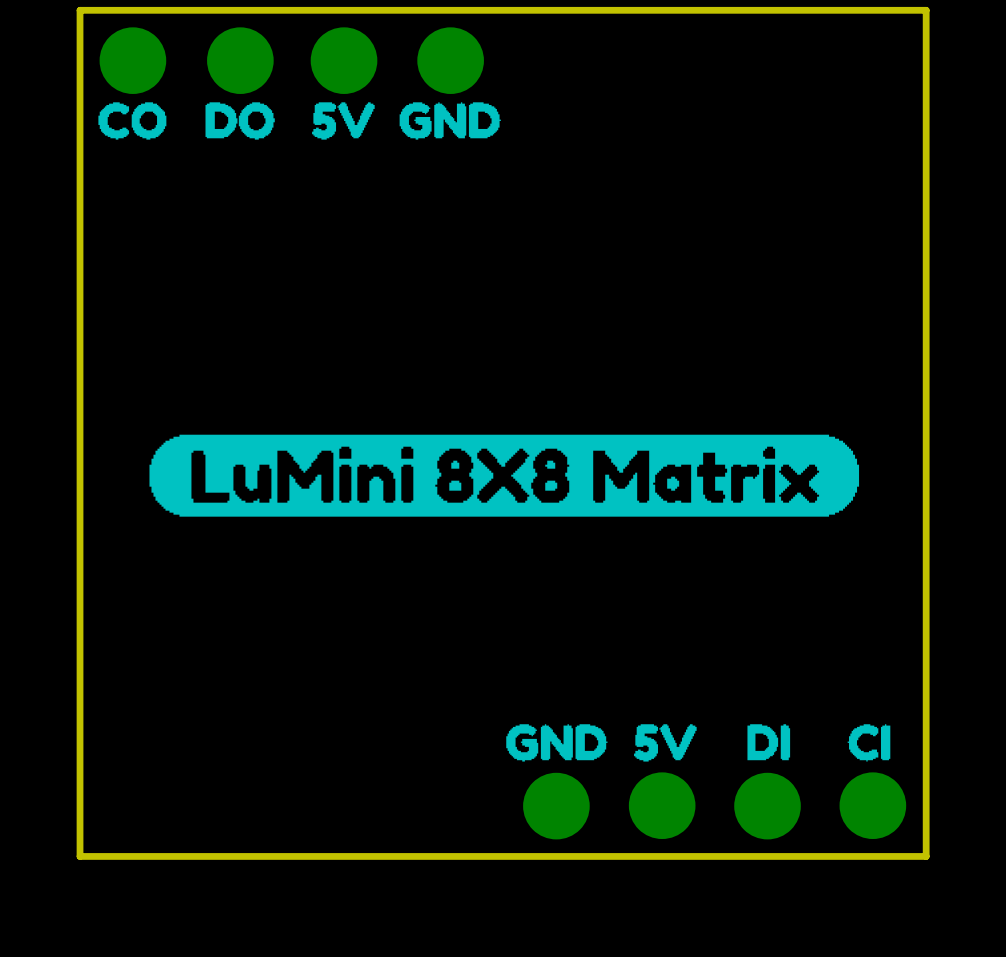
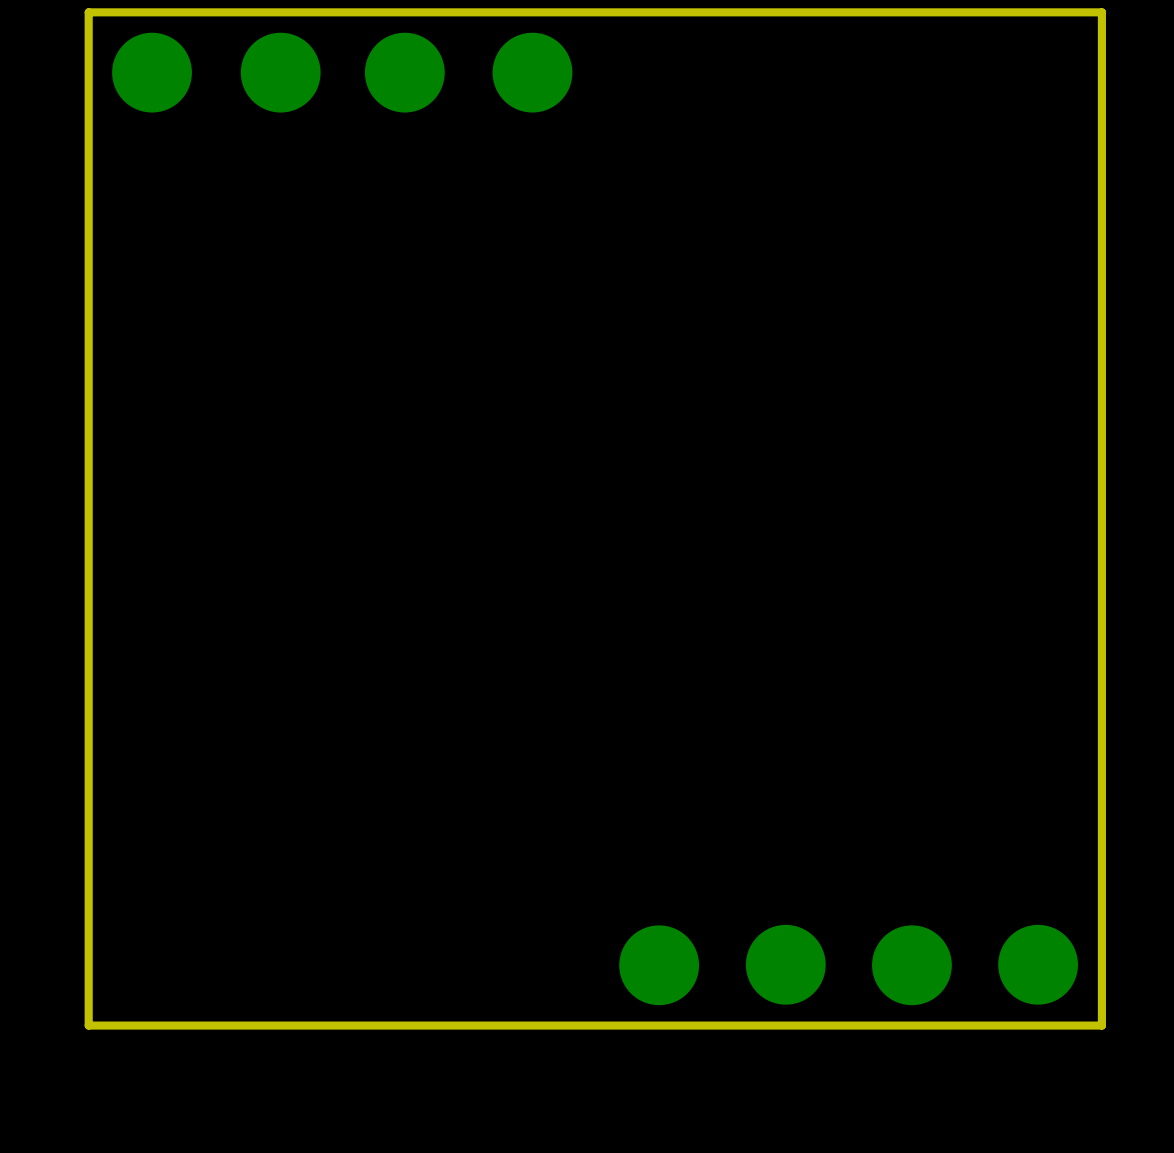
drawing: [98, 102, 501, 140] -> none
drawing: [149, 434, 860, 517] -> none
drawing: [506, 724, 697, 762] -> none
drawing: [747, 724, 791, 761] -> none
drawing: [847, 724, 891, 762] -> none

